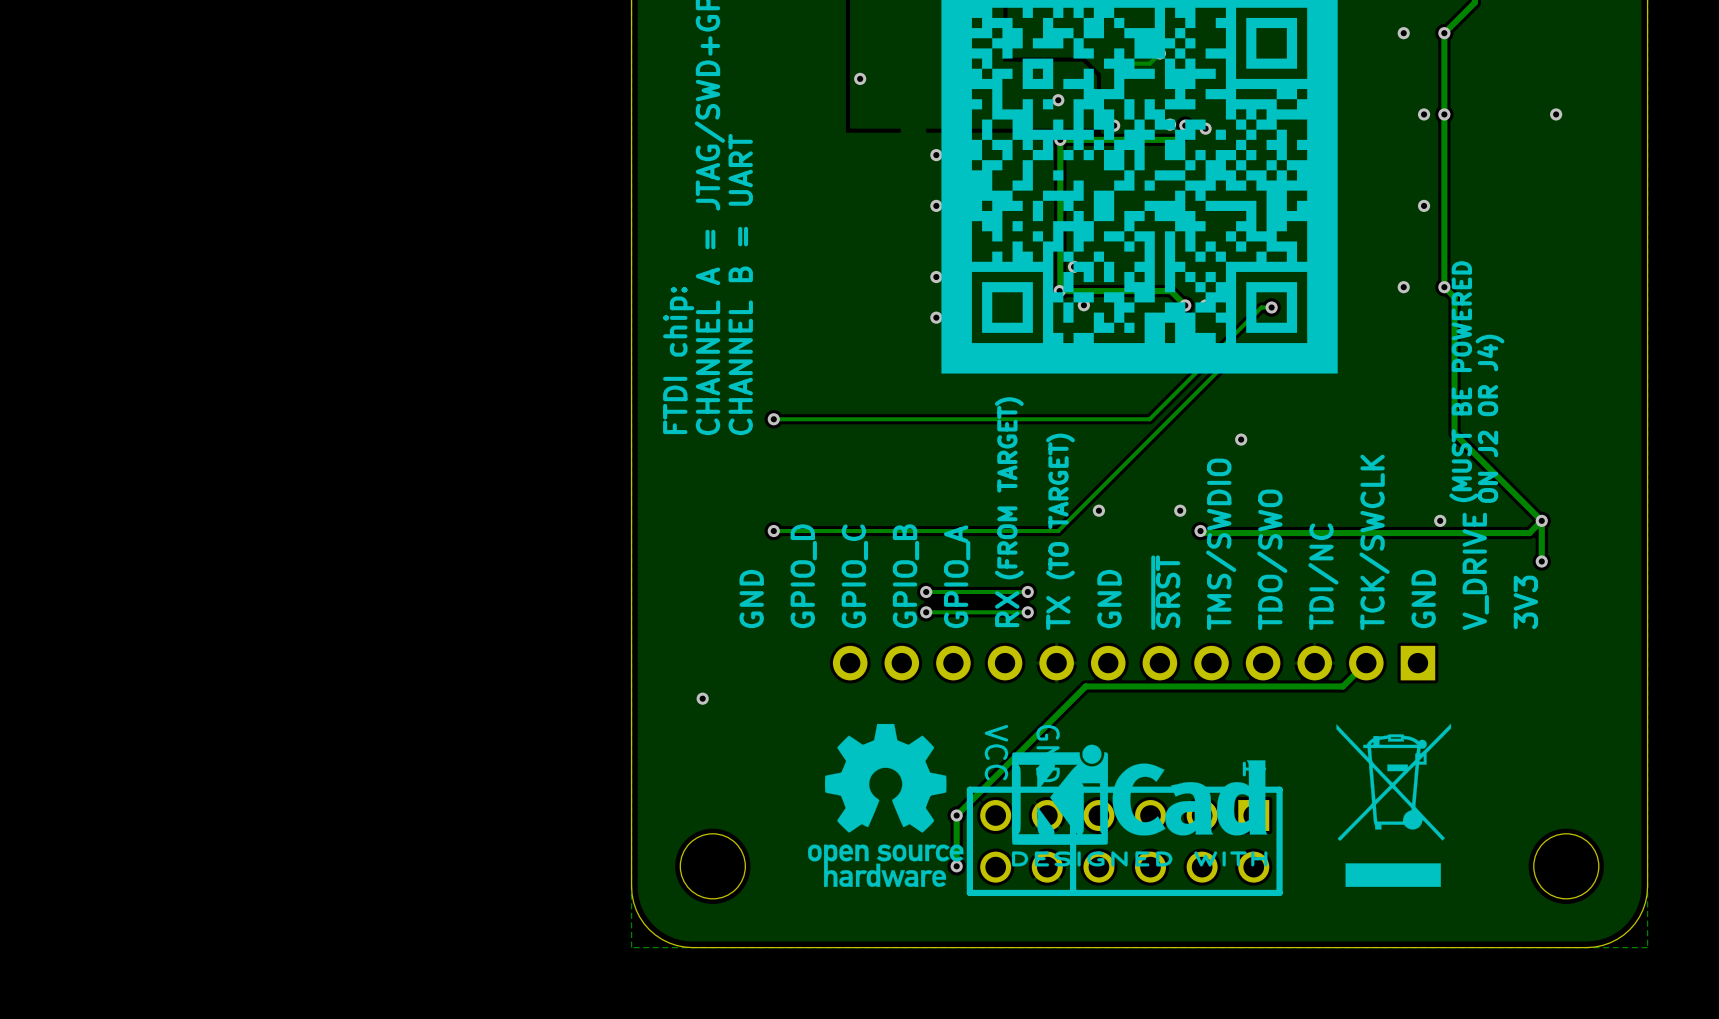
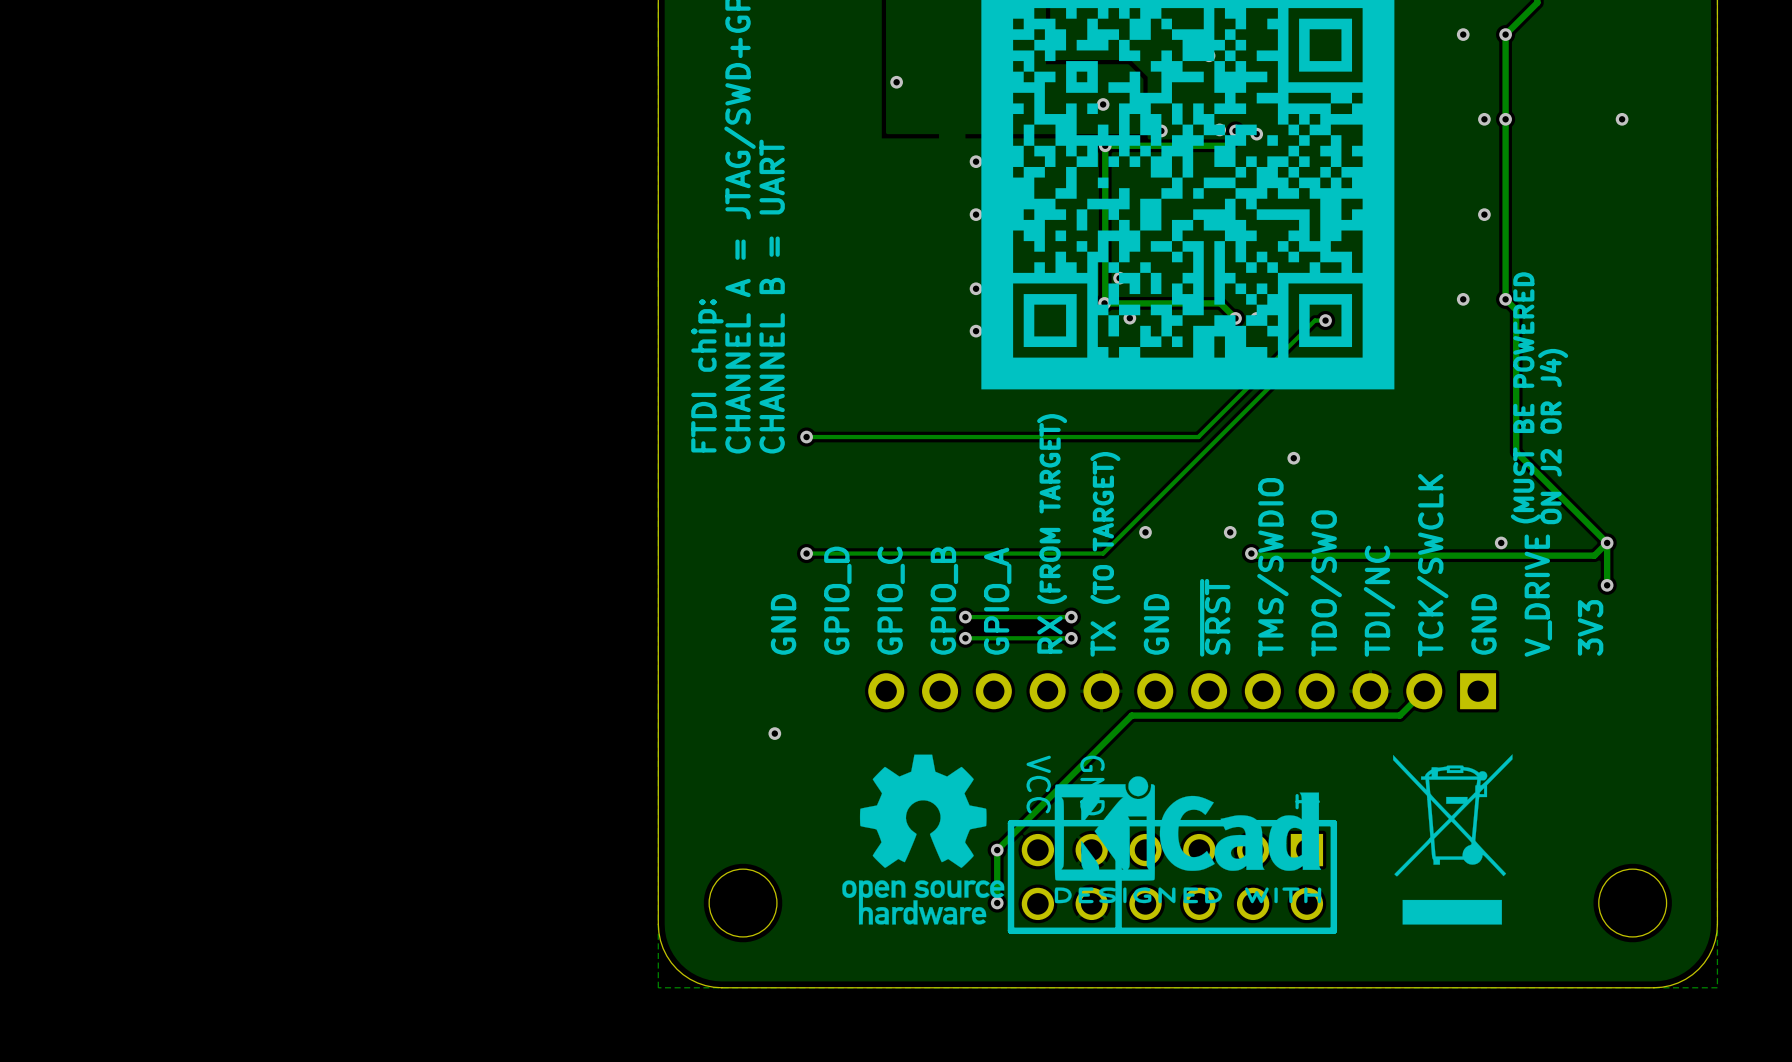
track: (1159, 53) (1149, 63) (1119, 63) -> none
via position: (702, 698) -> (774, 733)

